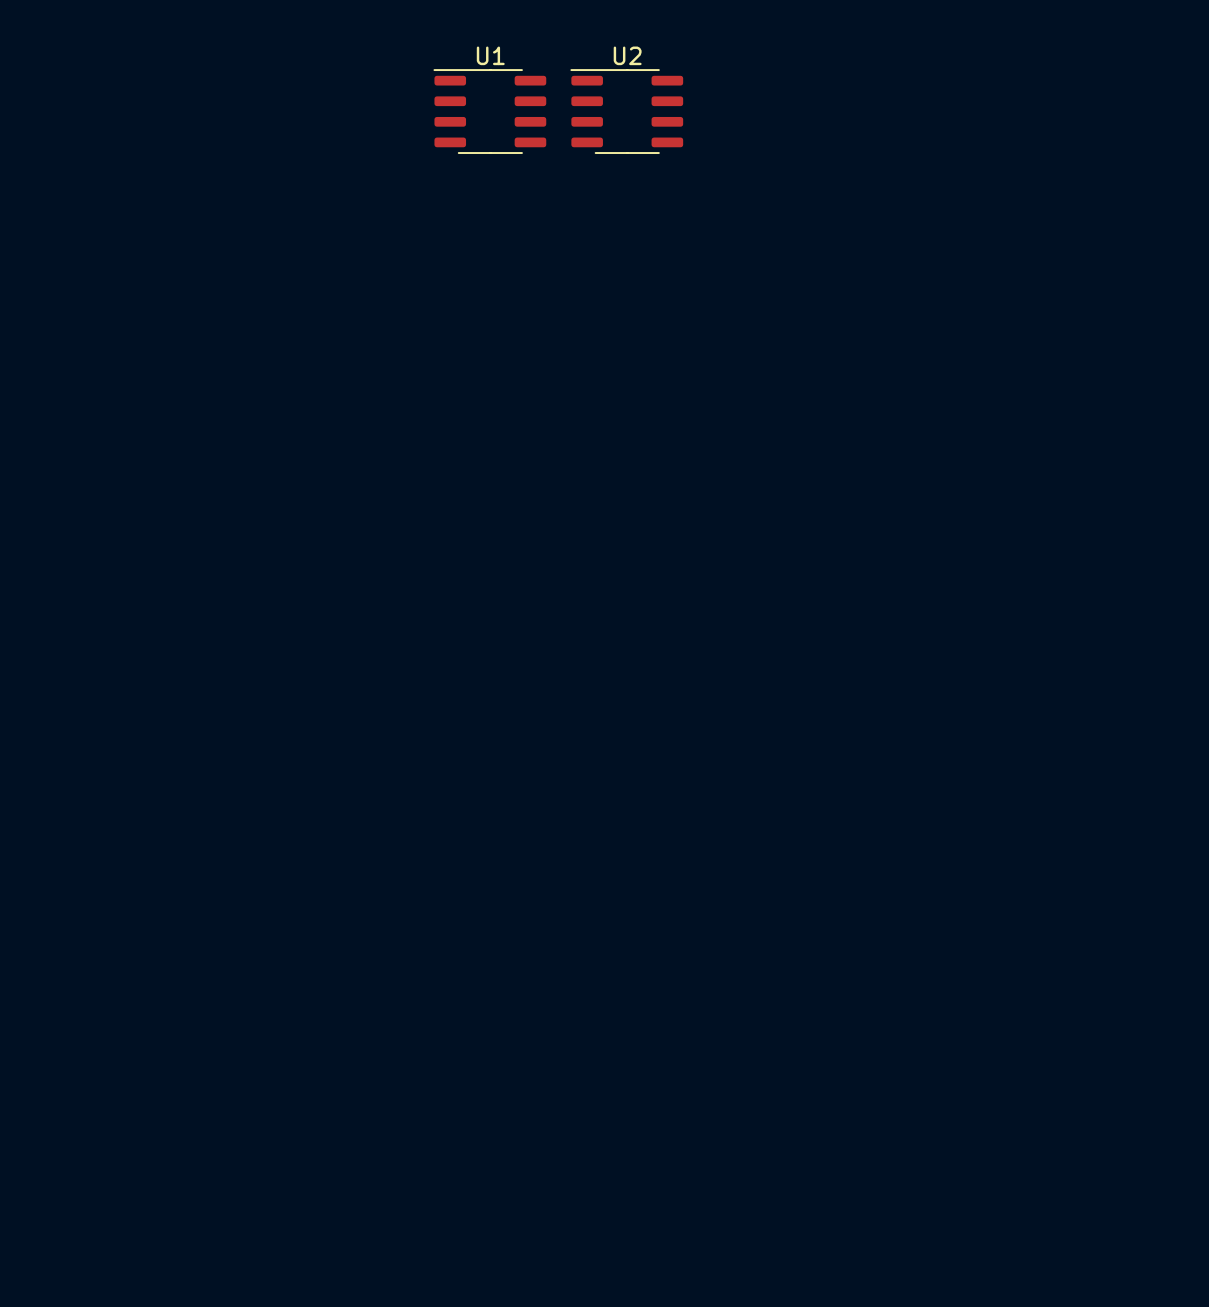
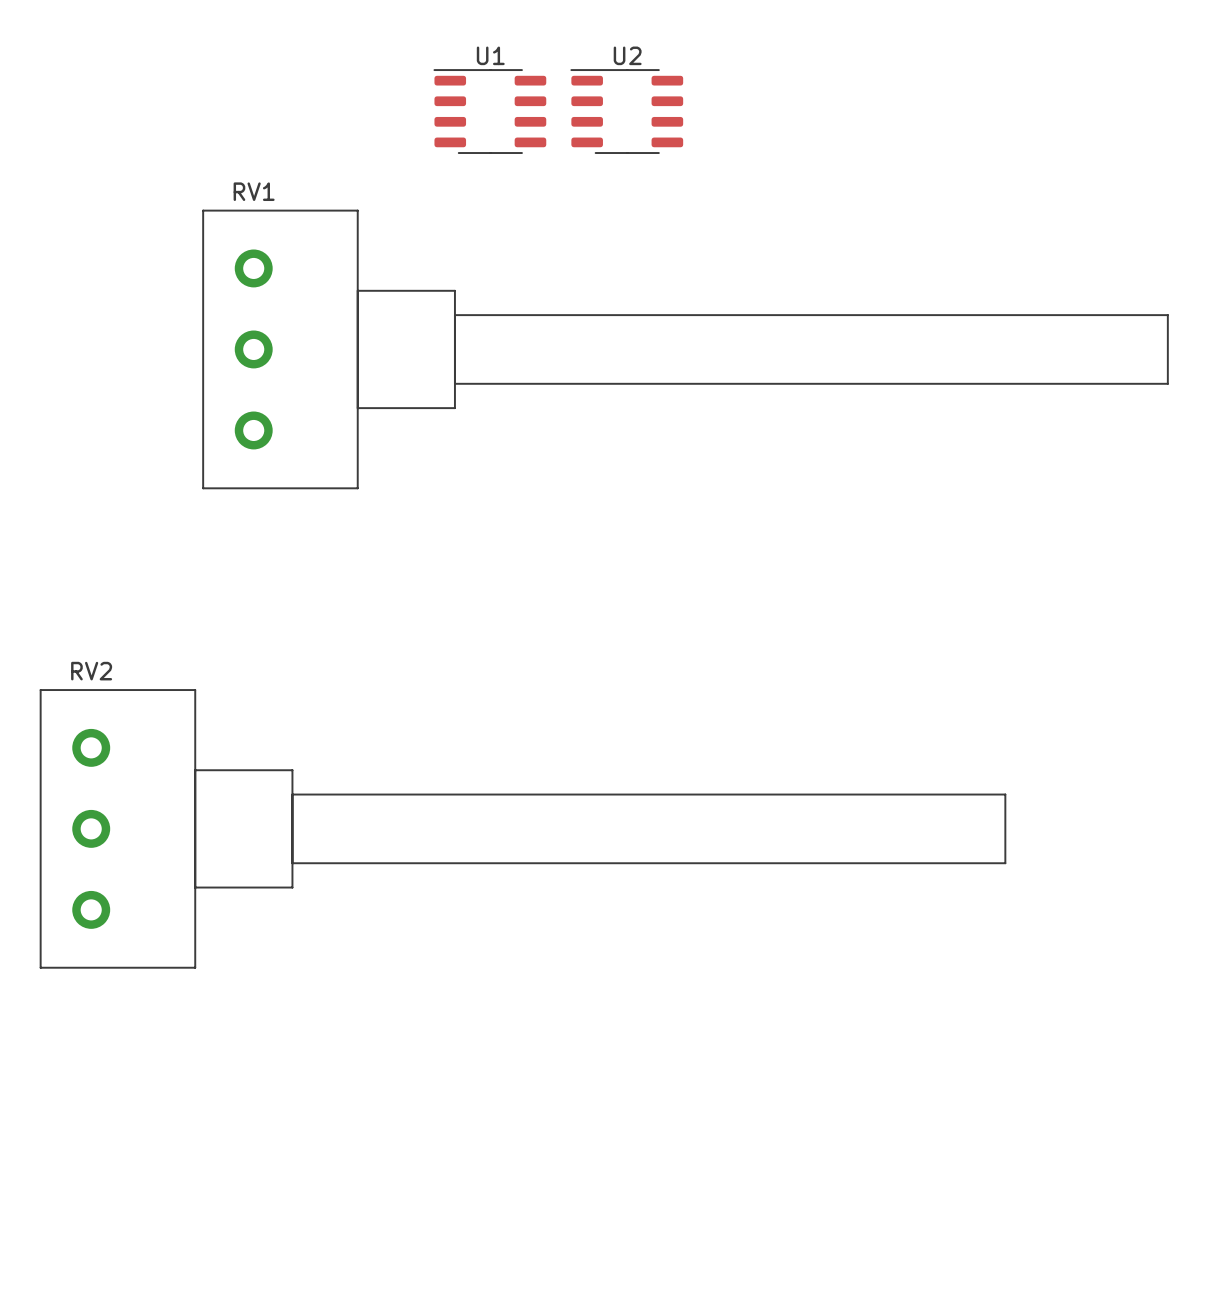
RV1: none -> (685, 349)
RV2: none -> (522, 828)

